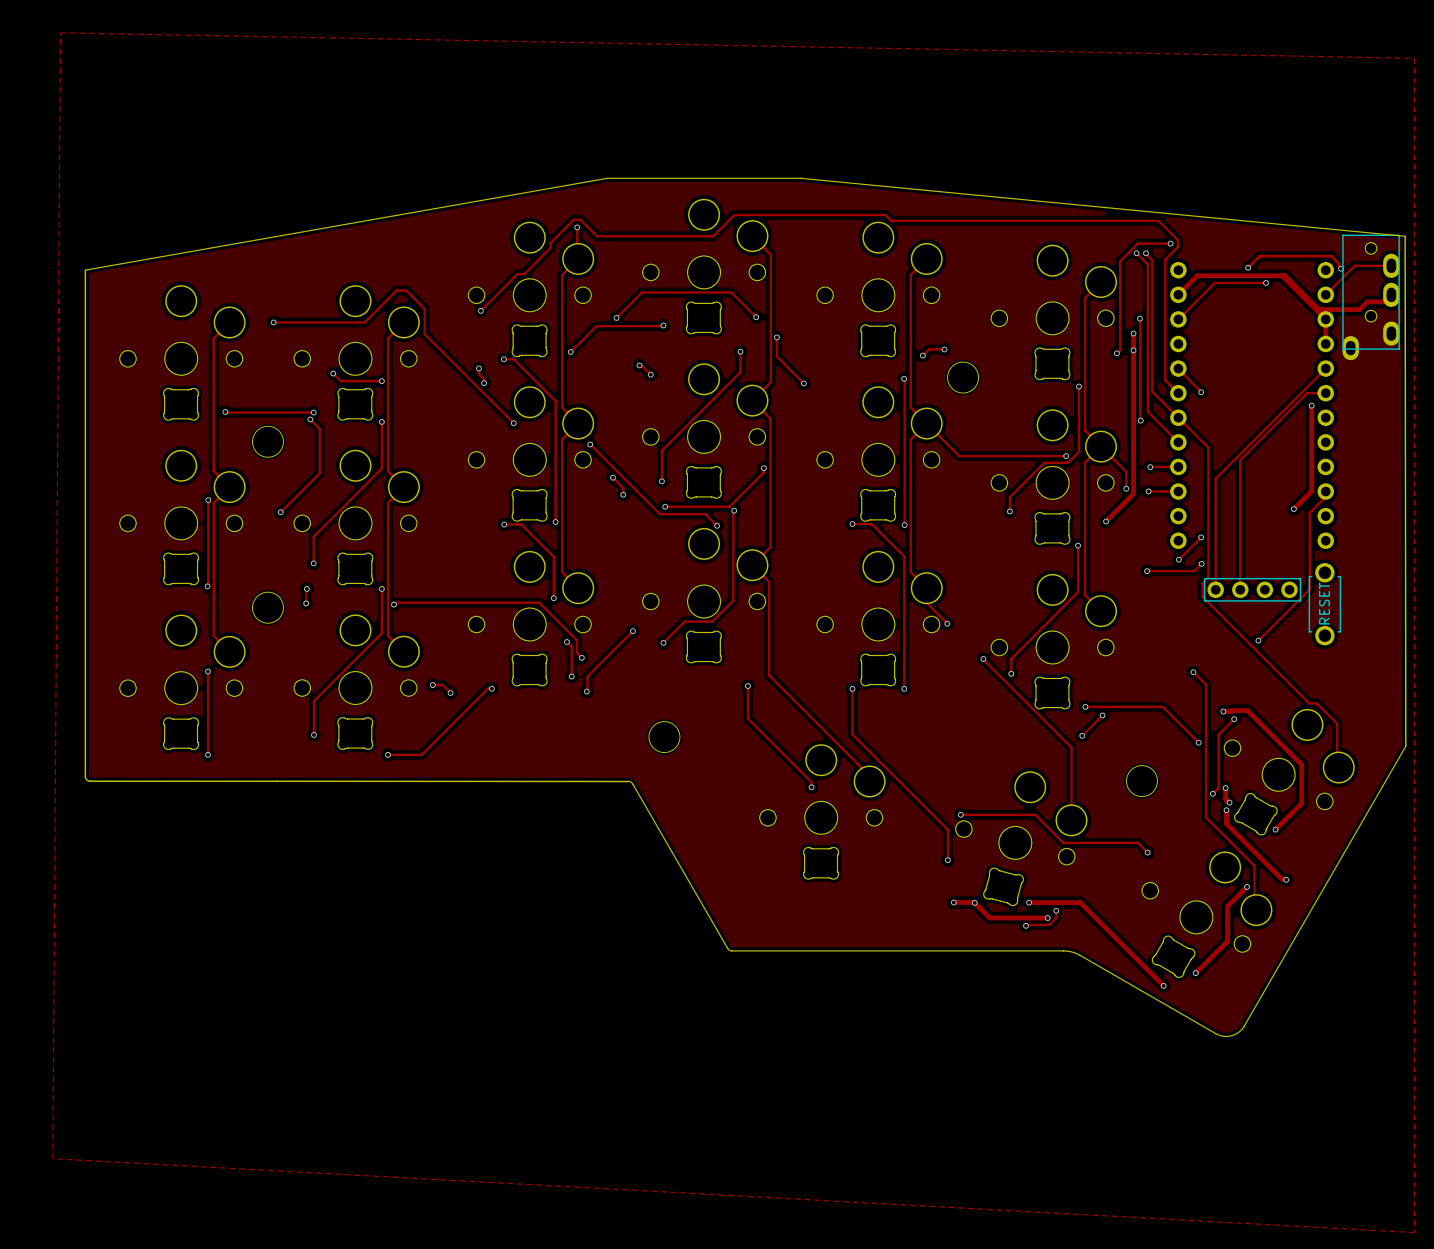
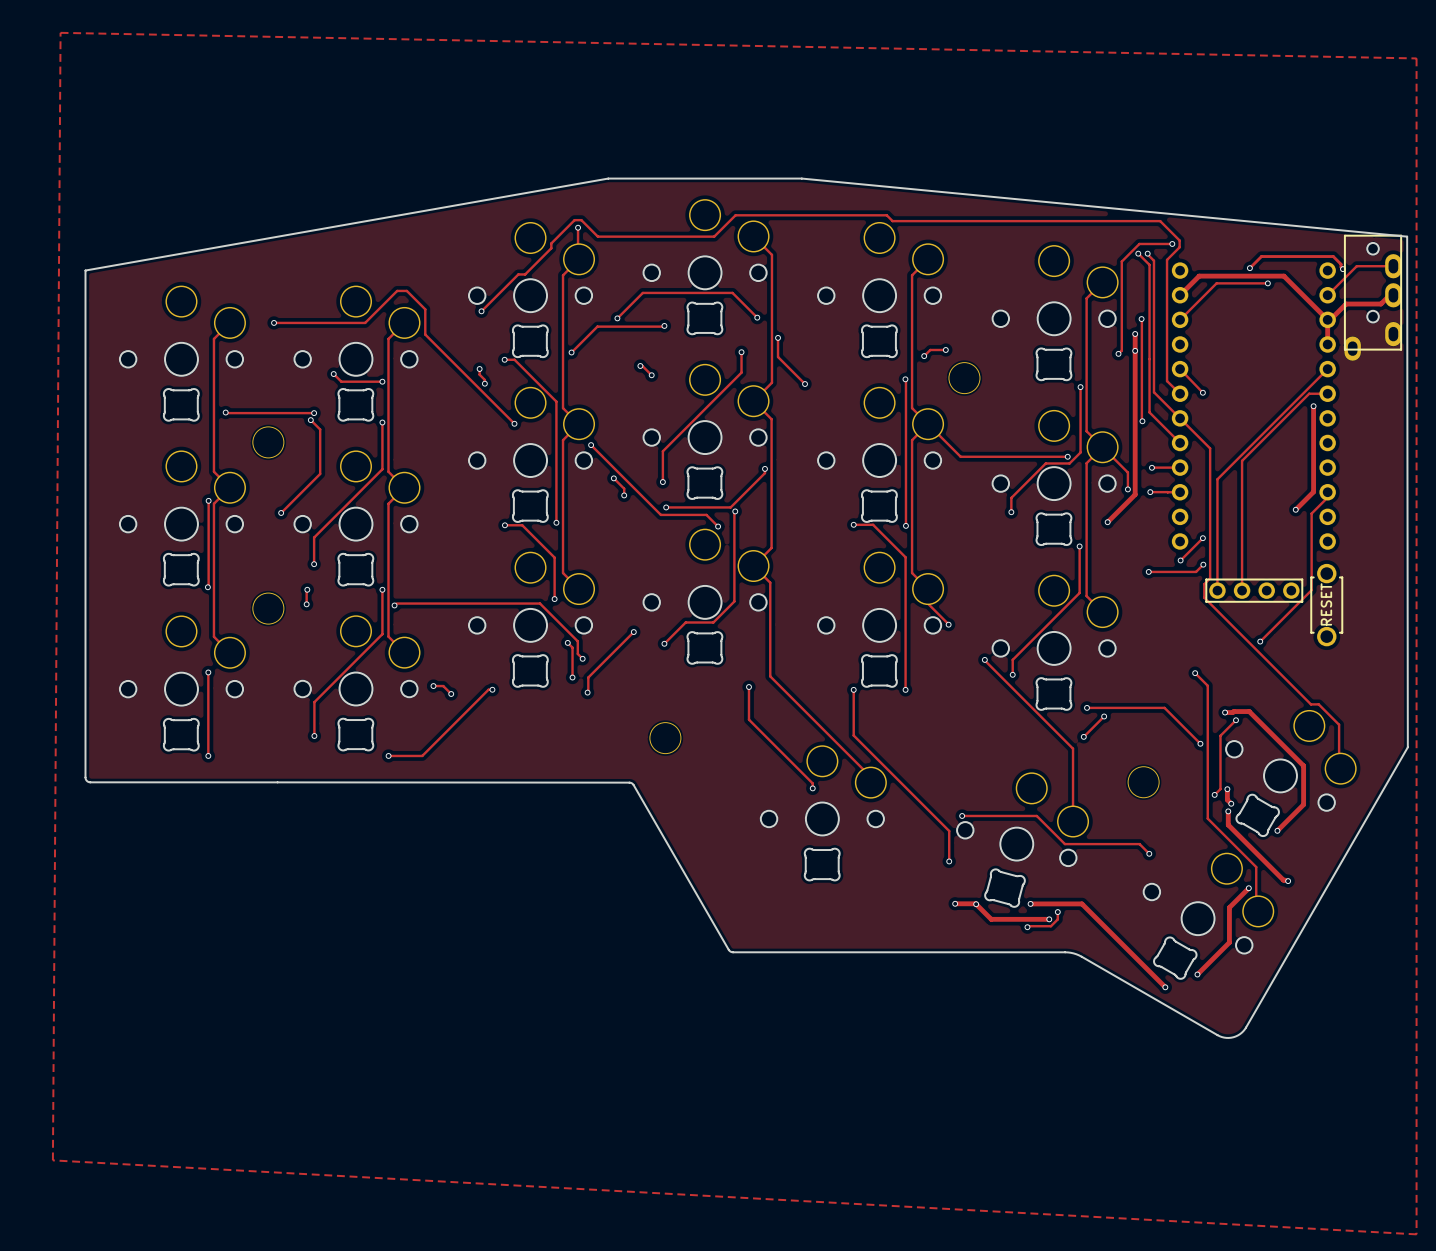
track: (1282, 275) (1284, 275) (1318, 309) (1359, 309) (1367, 301) (1383, 301) -> none
track: none -> (1393, 295) (1389, 295) (1380, 304) (1346, 304) (1334, 315)

